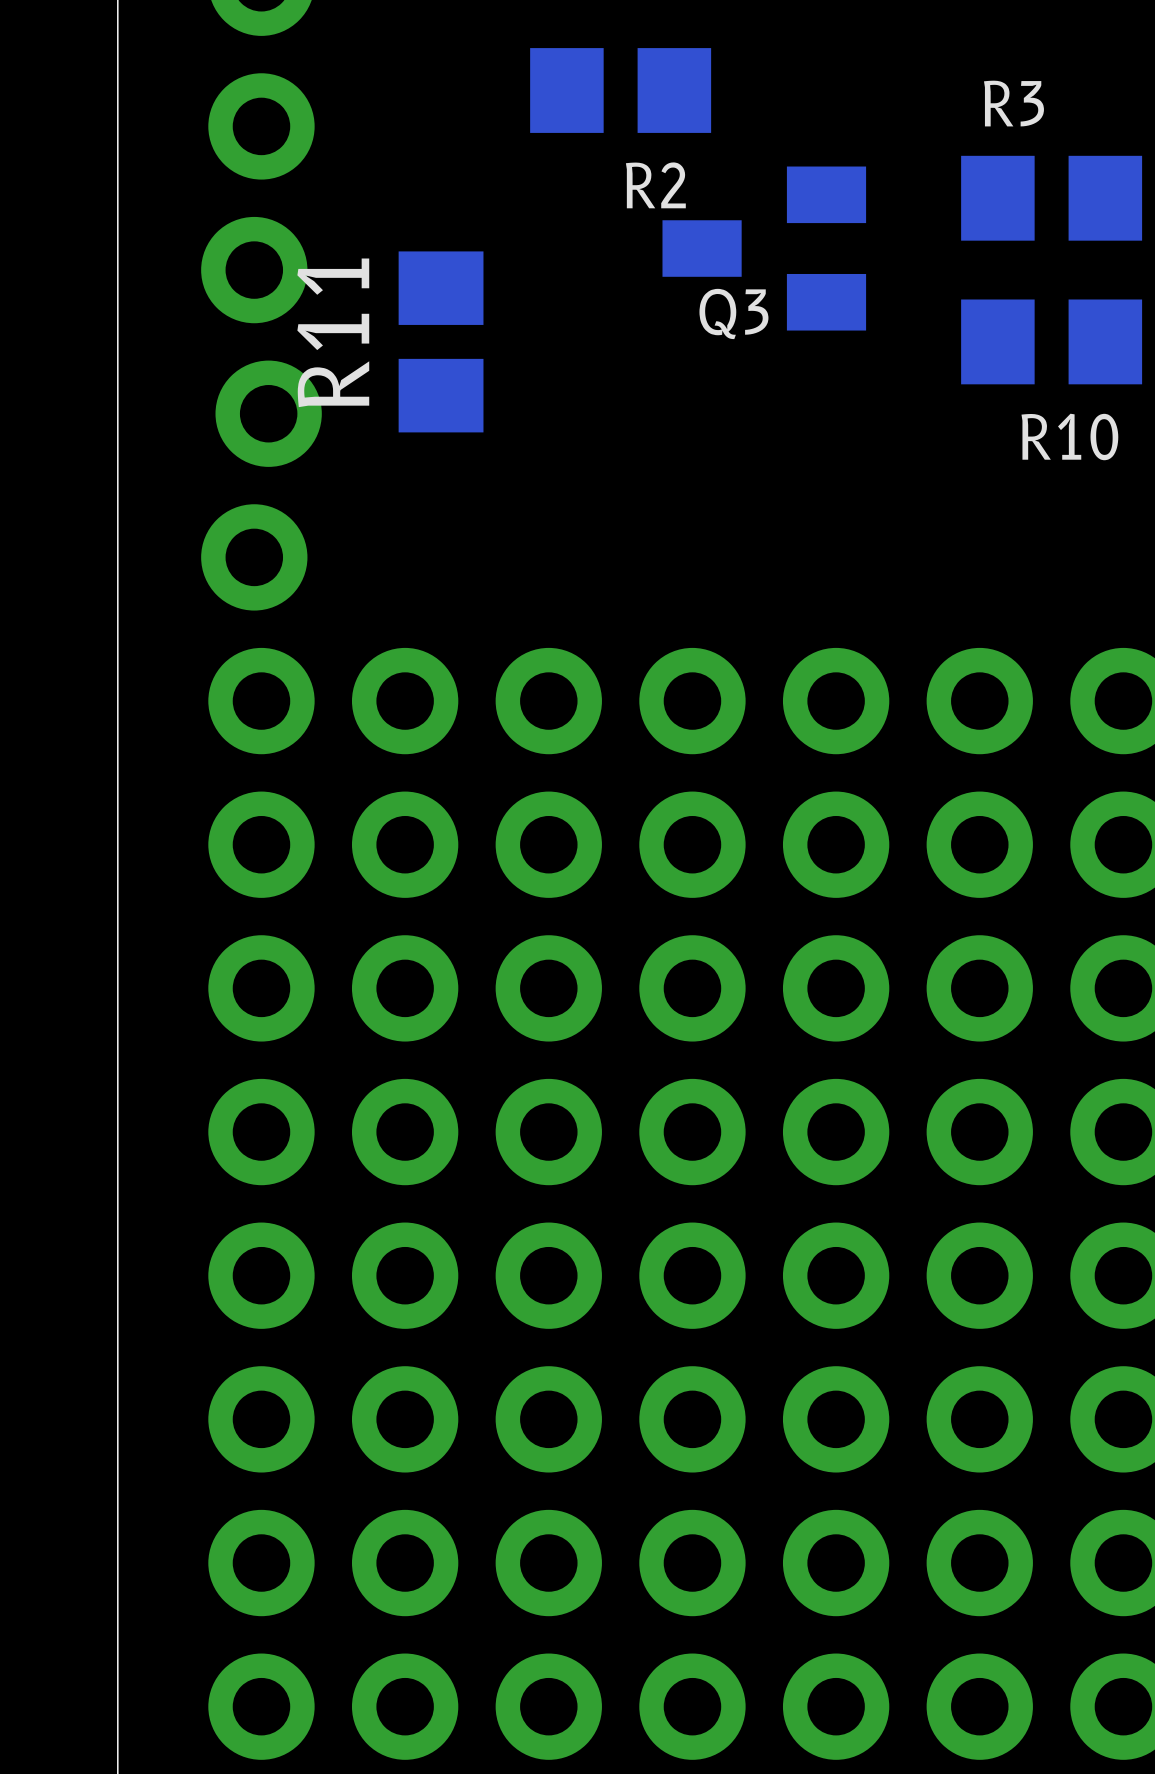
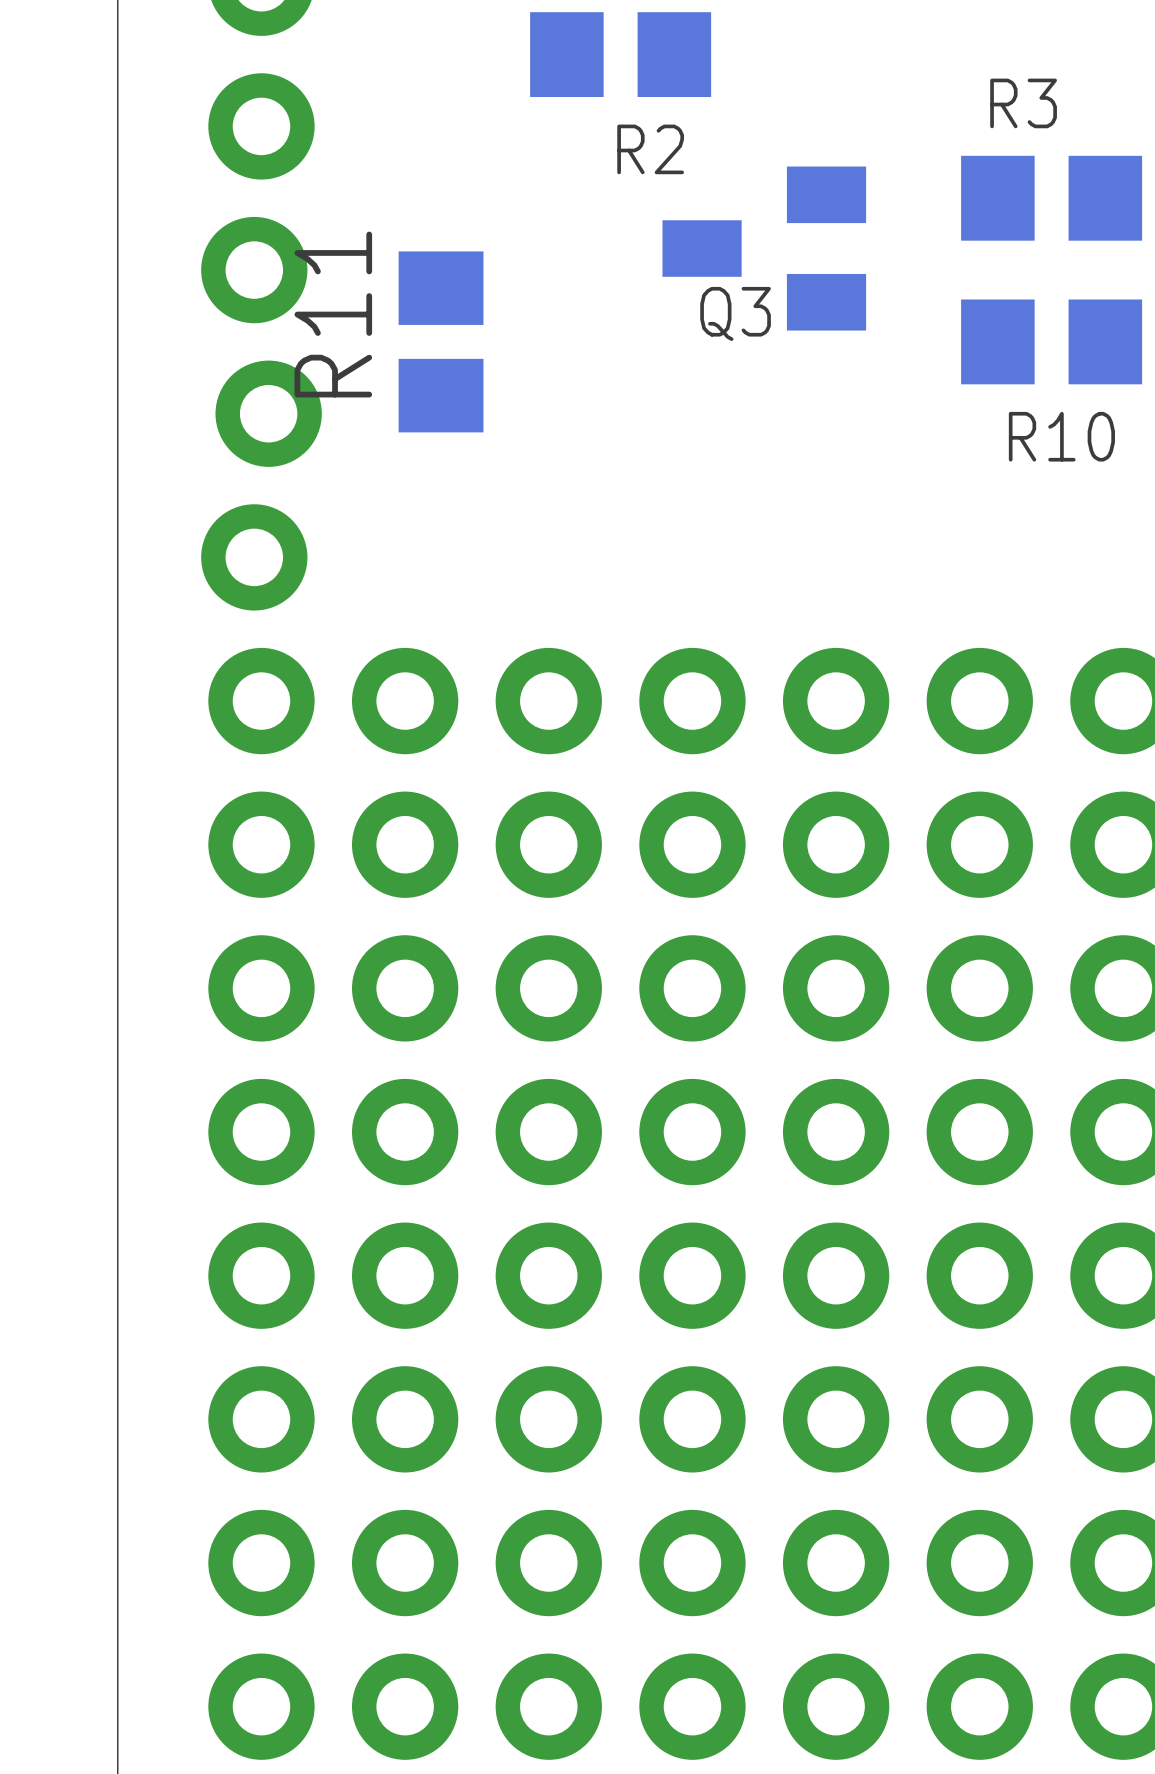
R2 position: (620, 90) -> (620, 54)

